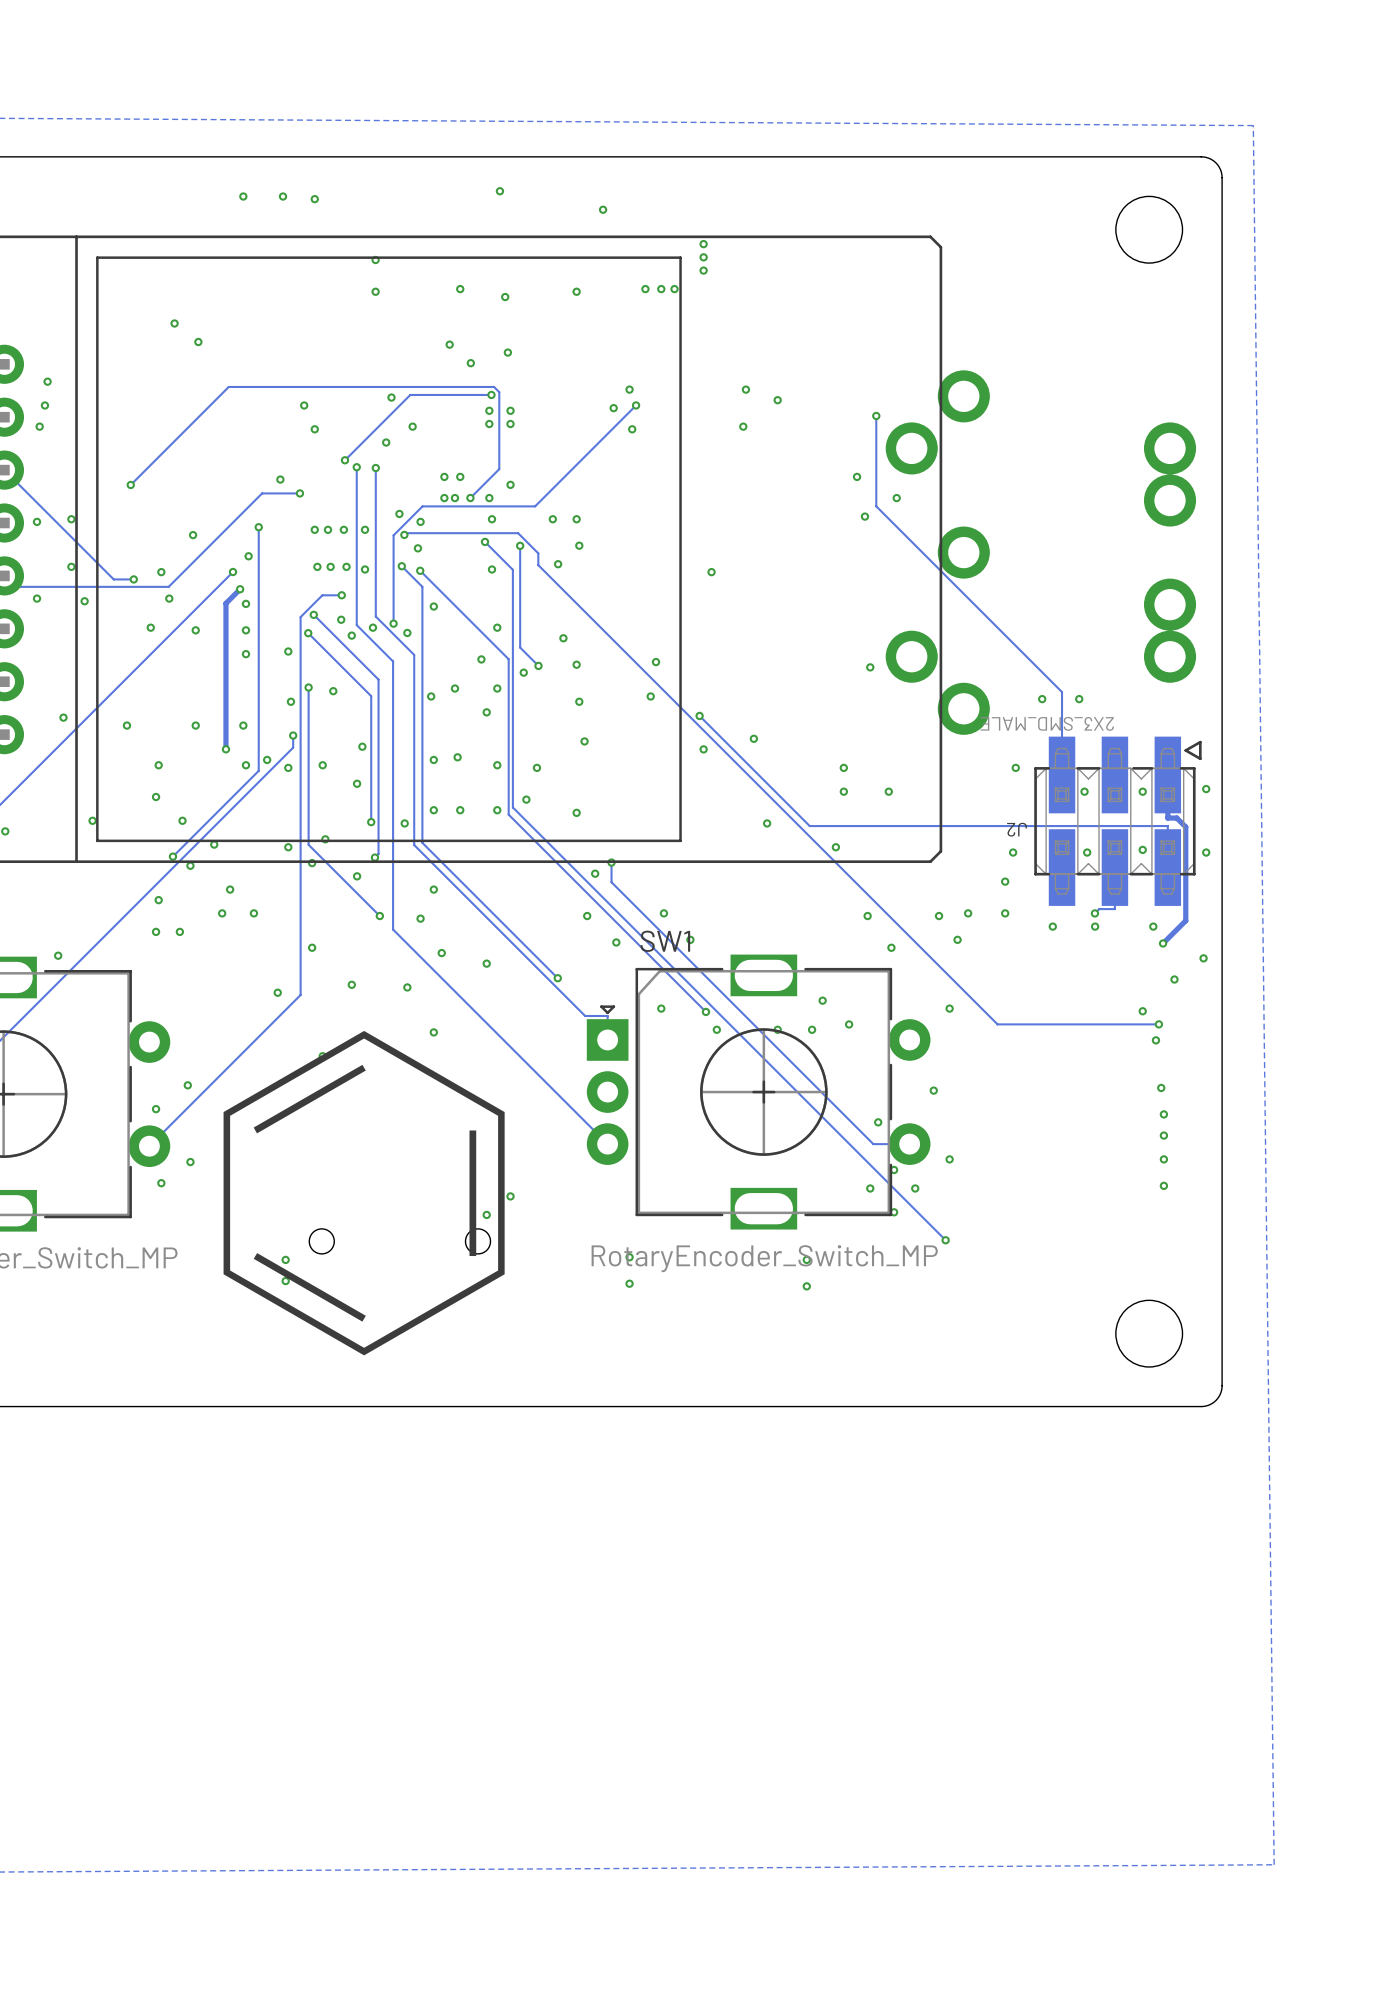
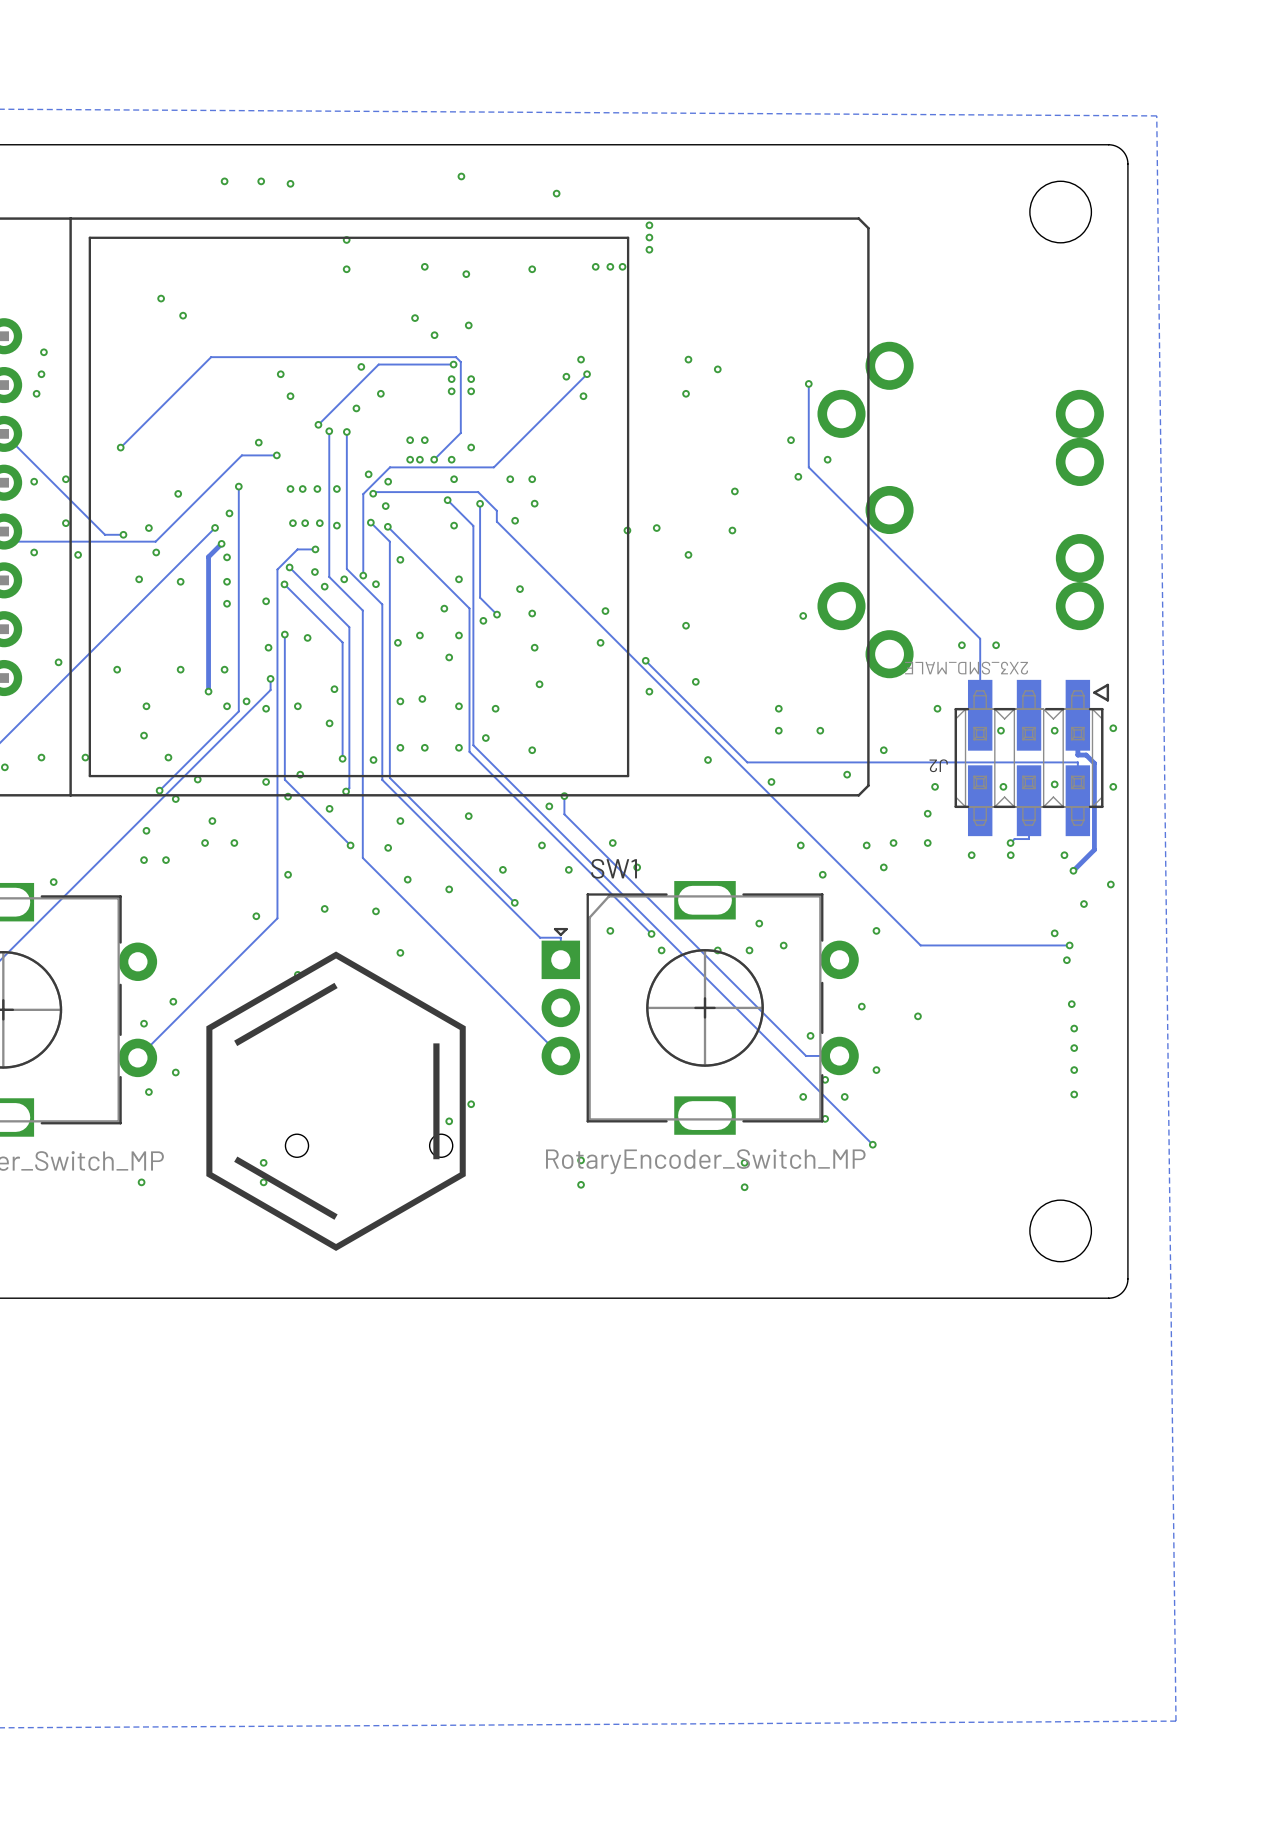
via: none -> (734, 491)
via: none -> (627, 530)
via: none -> (732, 530)
via: none -> (688, 554)
via: none -> (686, 625)
via: none -> (883, 750)
via: none -> (41, 757)
via: none -> (847, 774)
via: none -> (468, 816)
via: none -> (502, 869)
via: none -> (917, 1016)
via: none -> (141, 1182)

